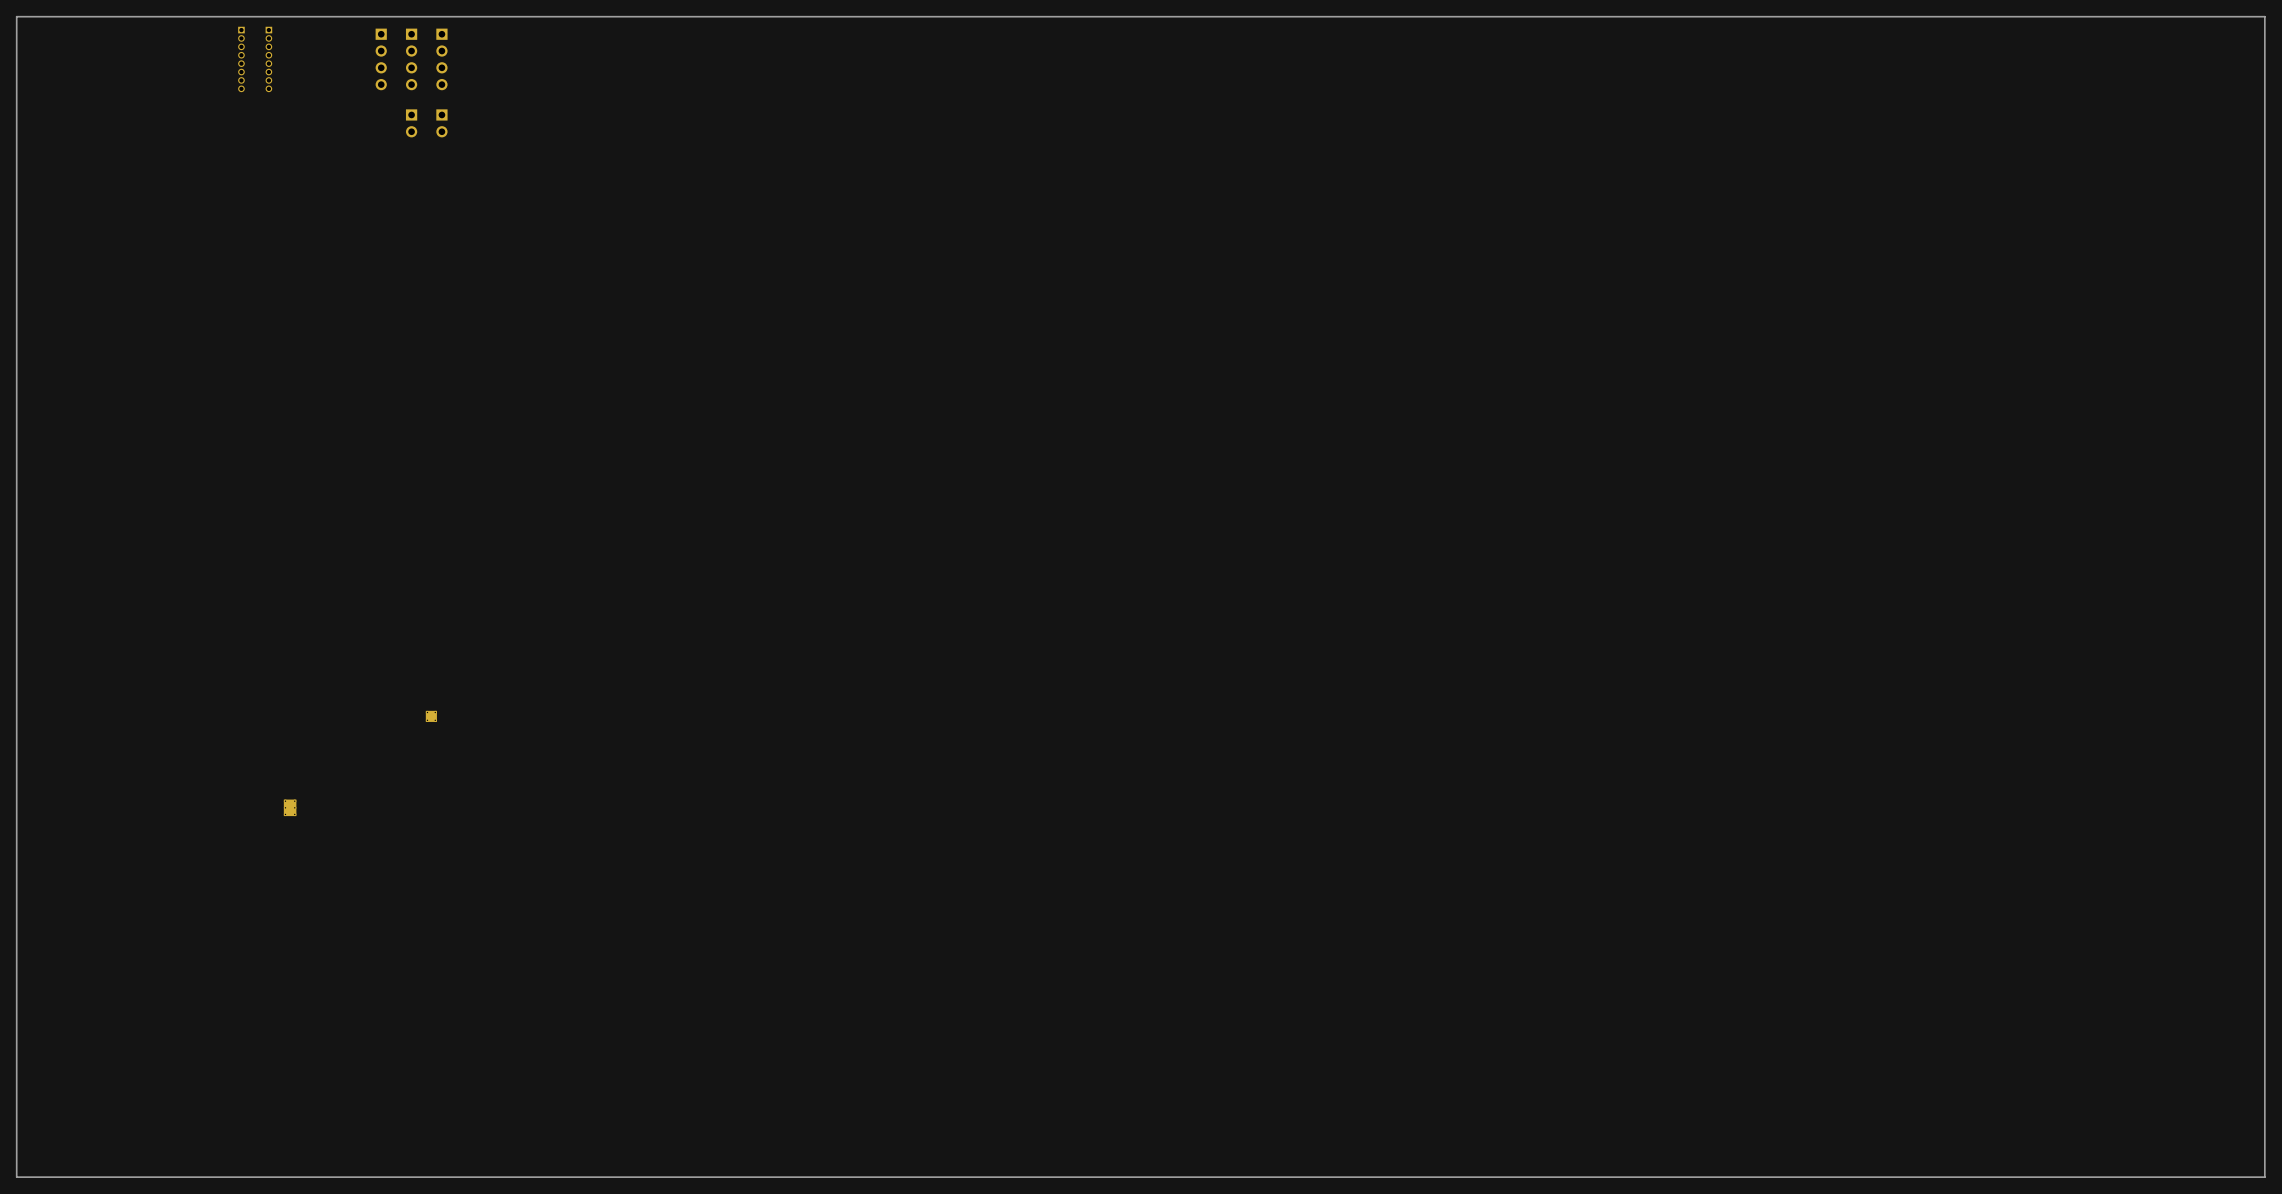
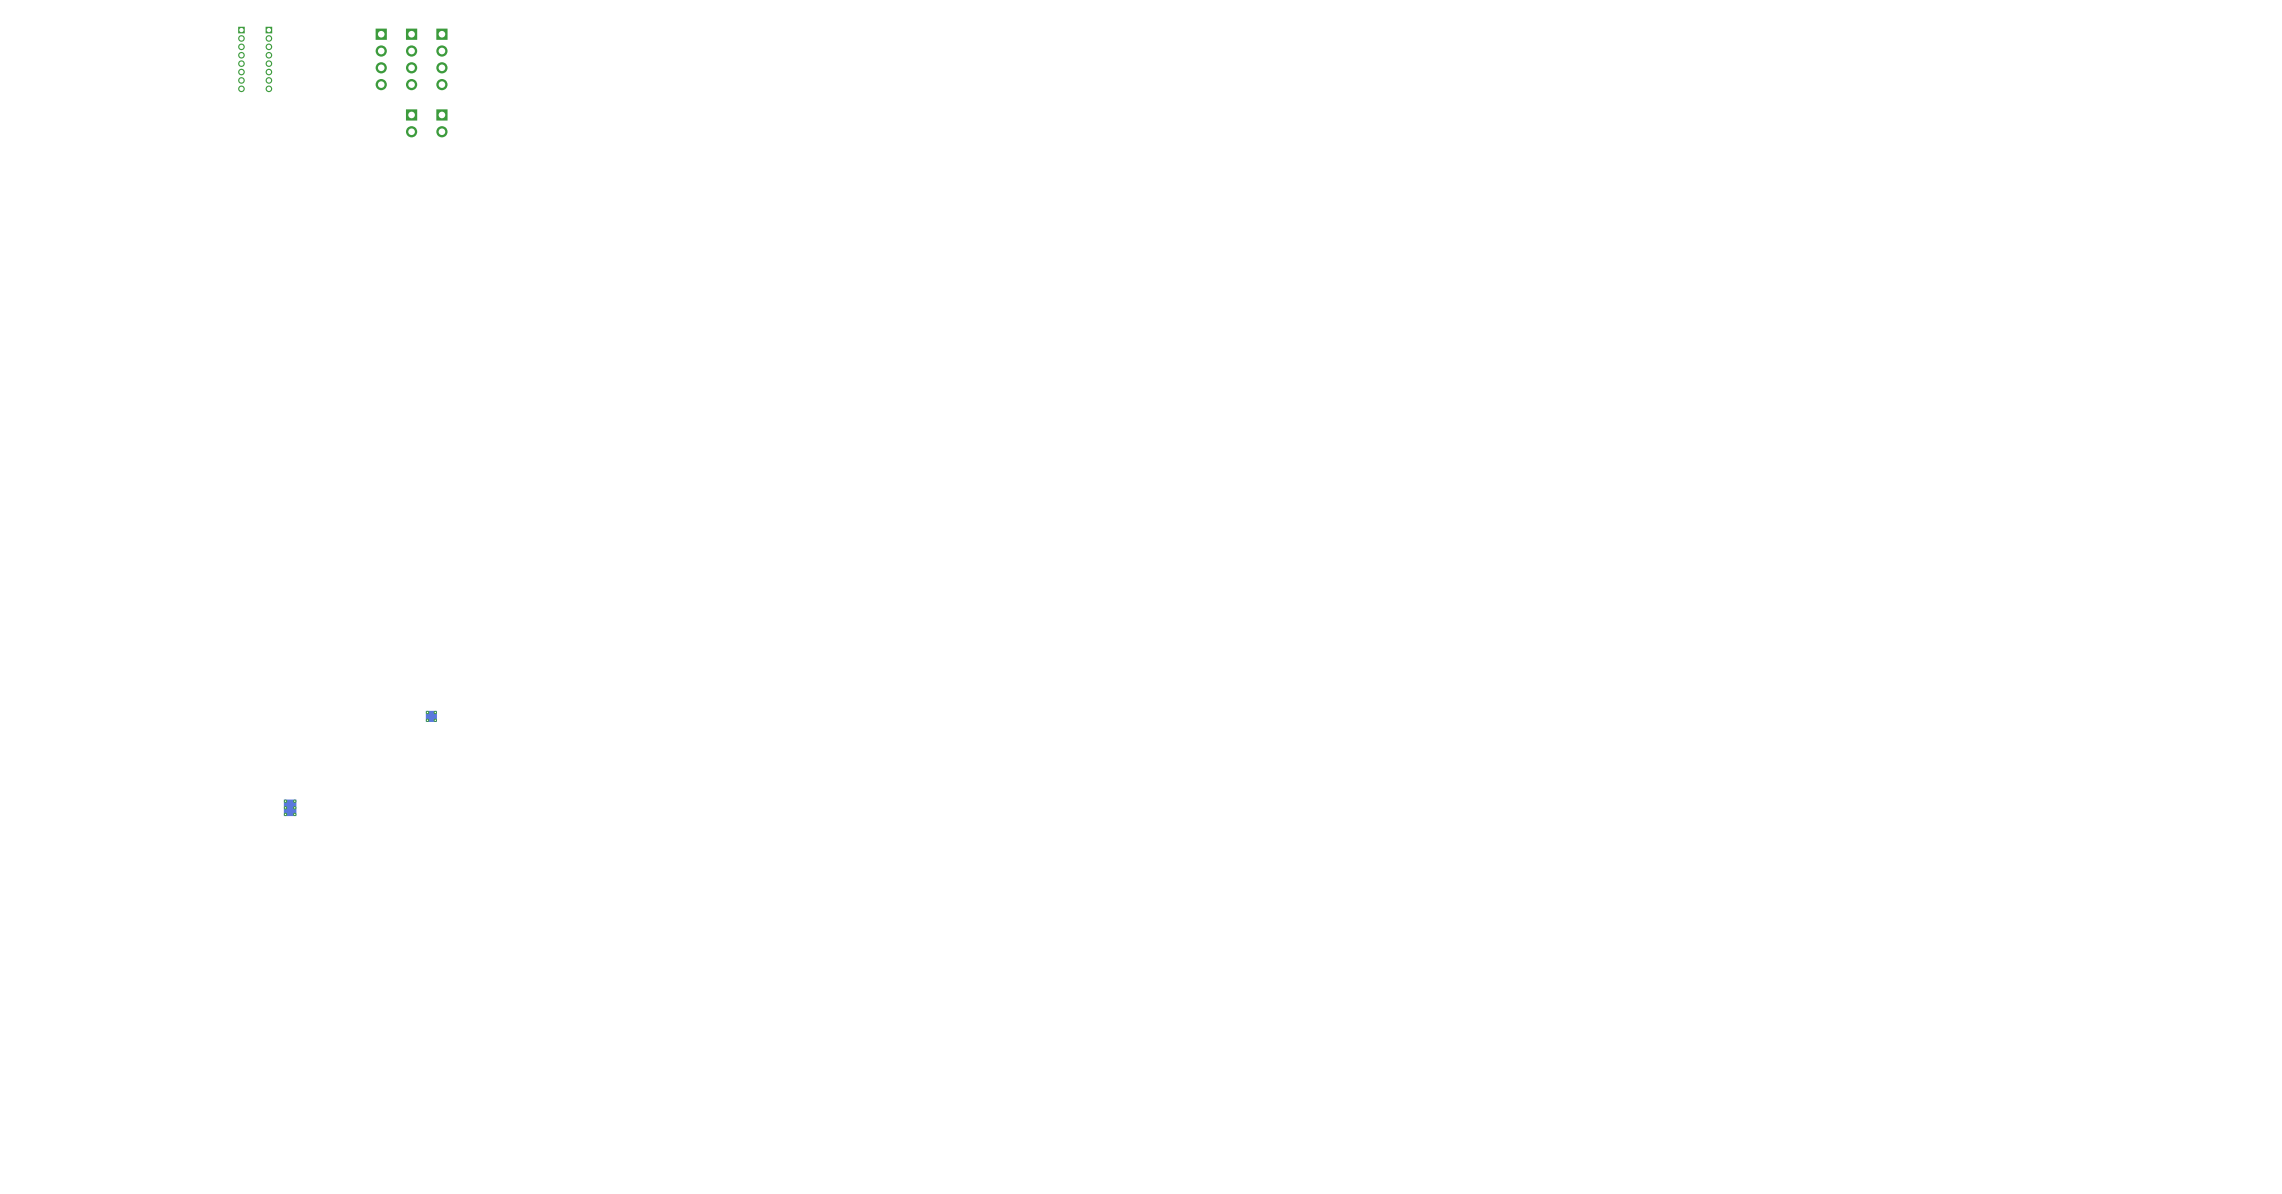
board edge: (2264, 16) (16, 16) (16, 1177) (2264, 1177) (2264, 16) -> none

